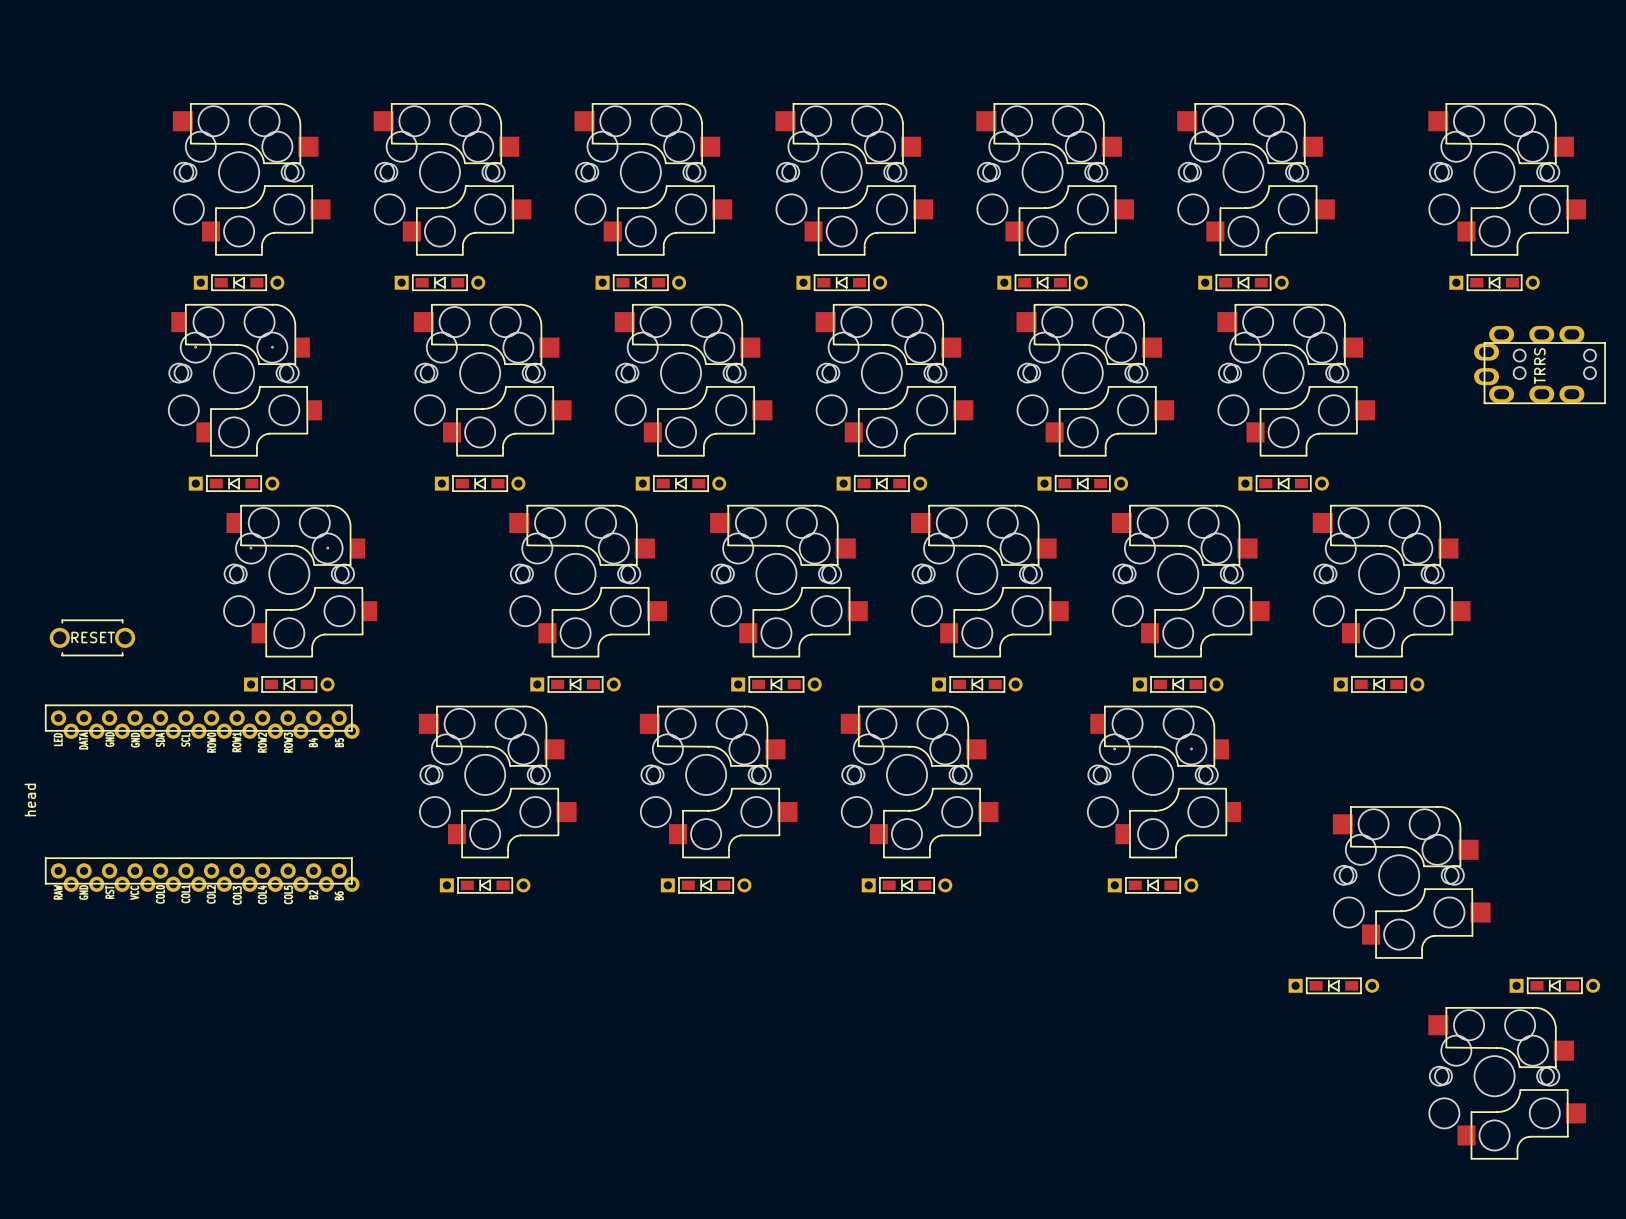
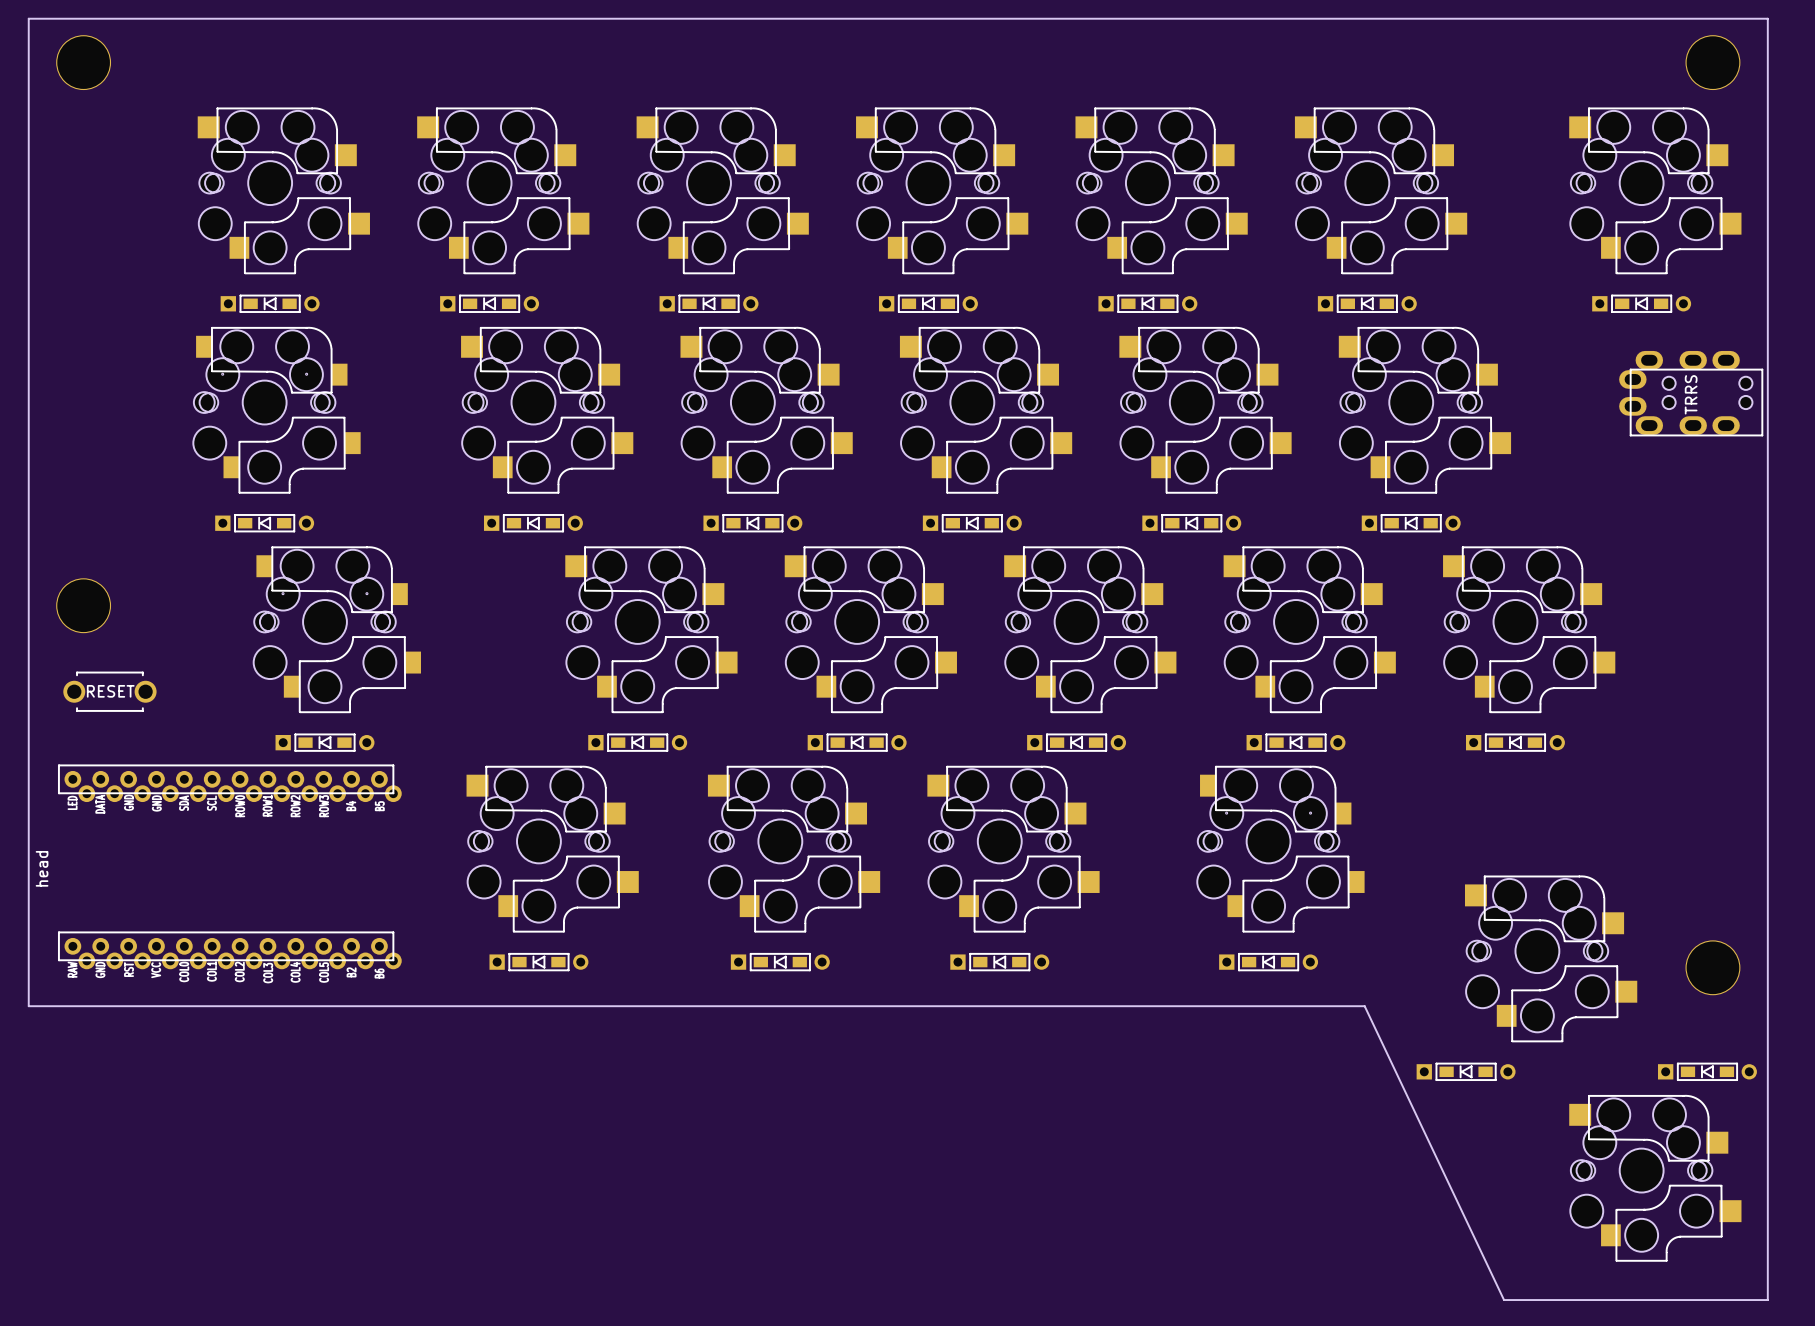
board edge: none -> (28, 18) (28, 1006) (1364, 1006) (1504, 1300) (1767, 1300) (1767, 18) (28, 18)
part: none -> (83, 62)
part: none -> (1712, 62)
part: none -> (83, 605)
part: none -> (1712, 967)

